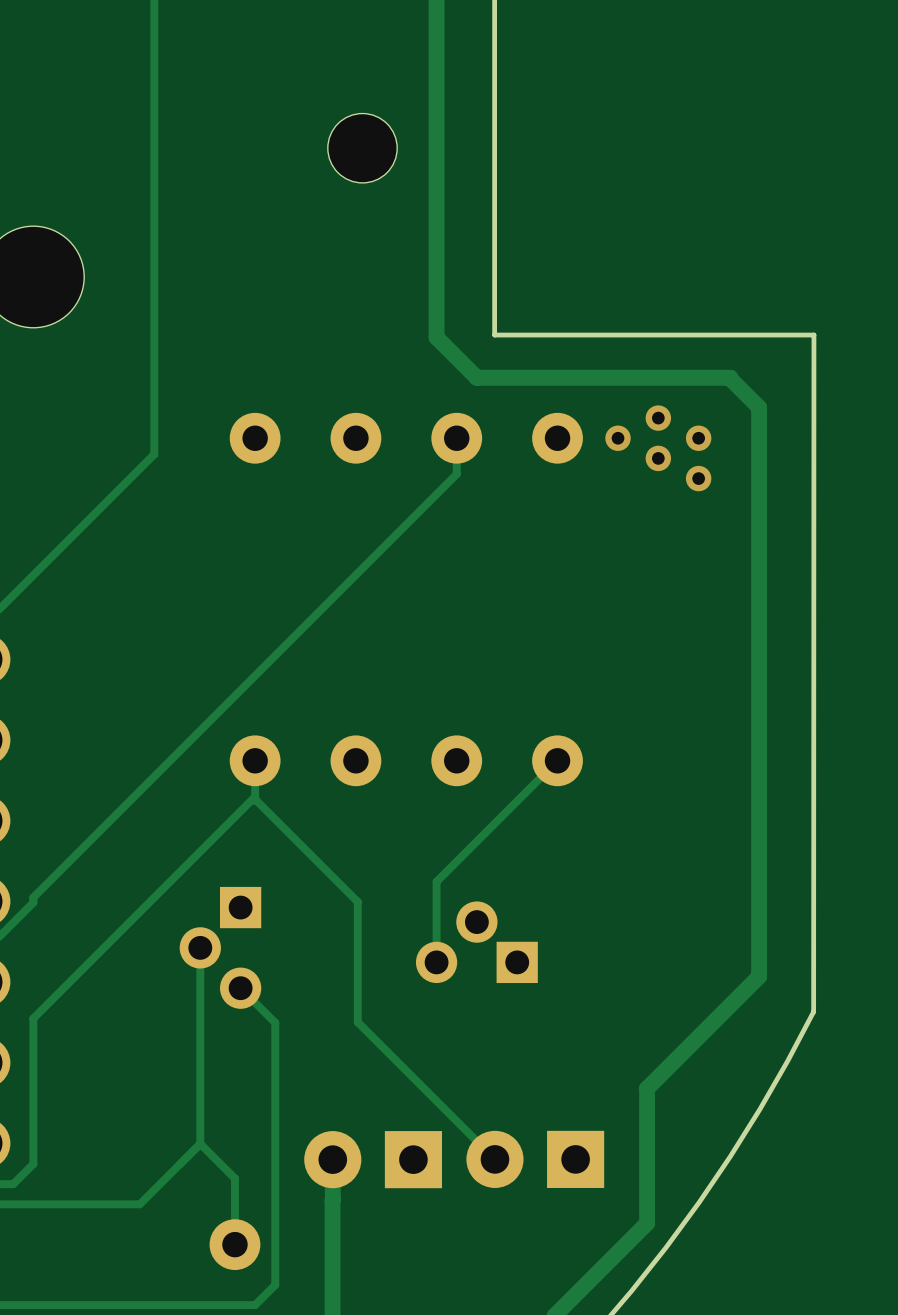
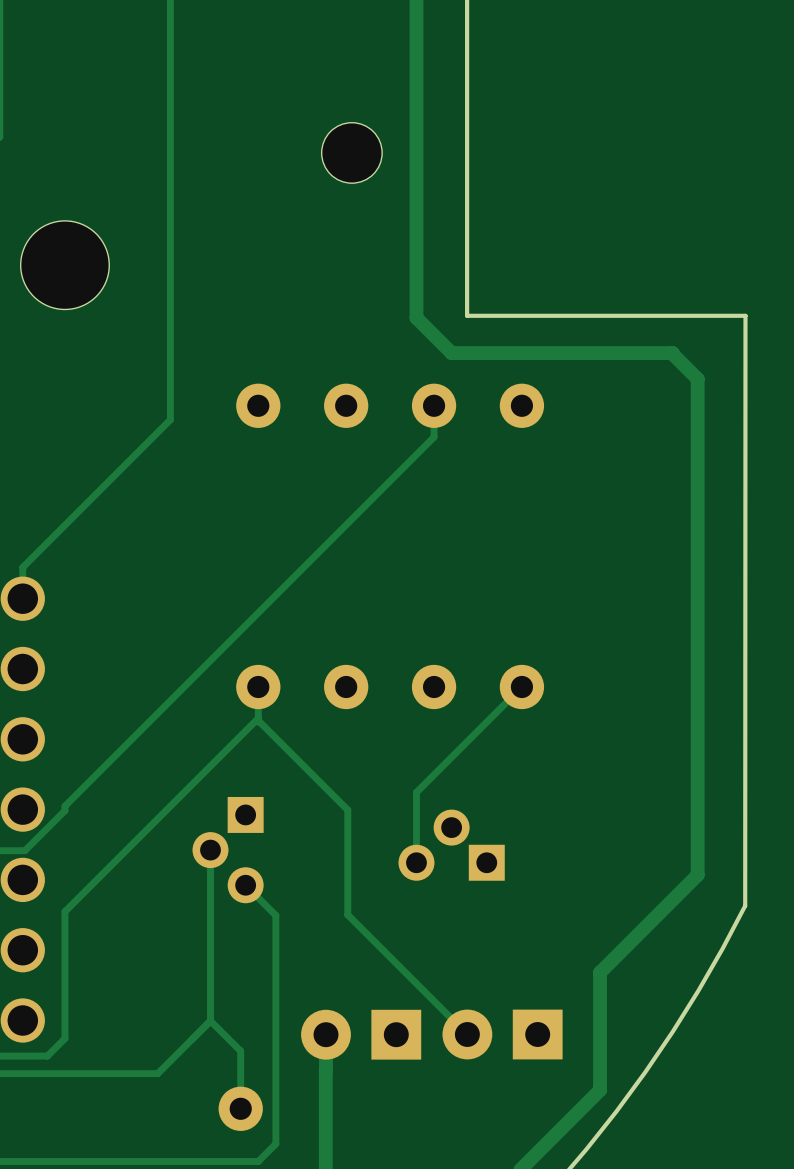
via: (658, 418) -> none
via: (618, 438) -> none
via: (698, 438) -> none
via: (658, 458) -> none
via: (698, 478) -> none

